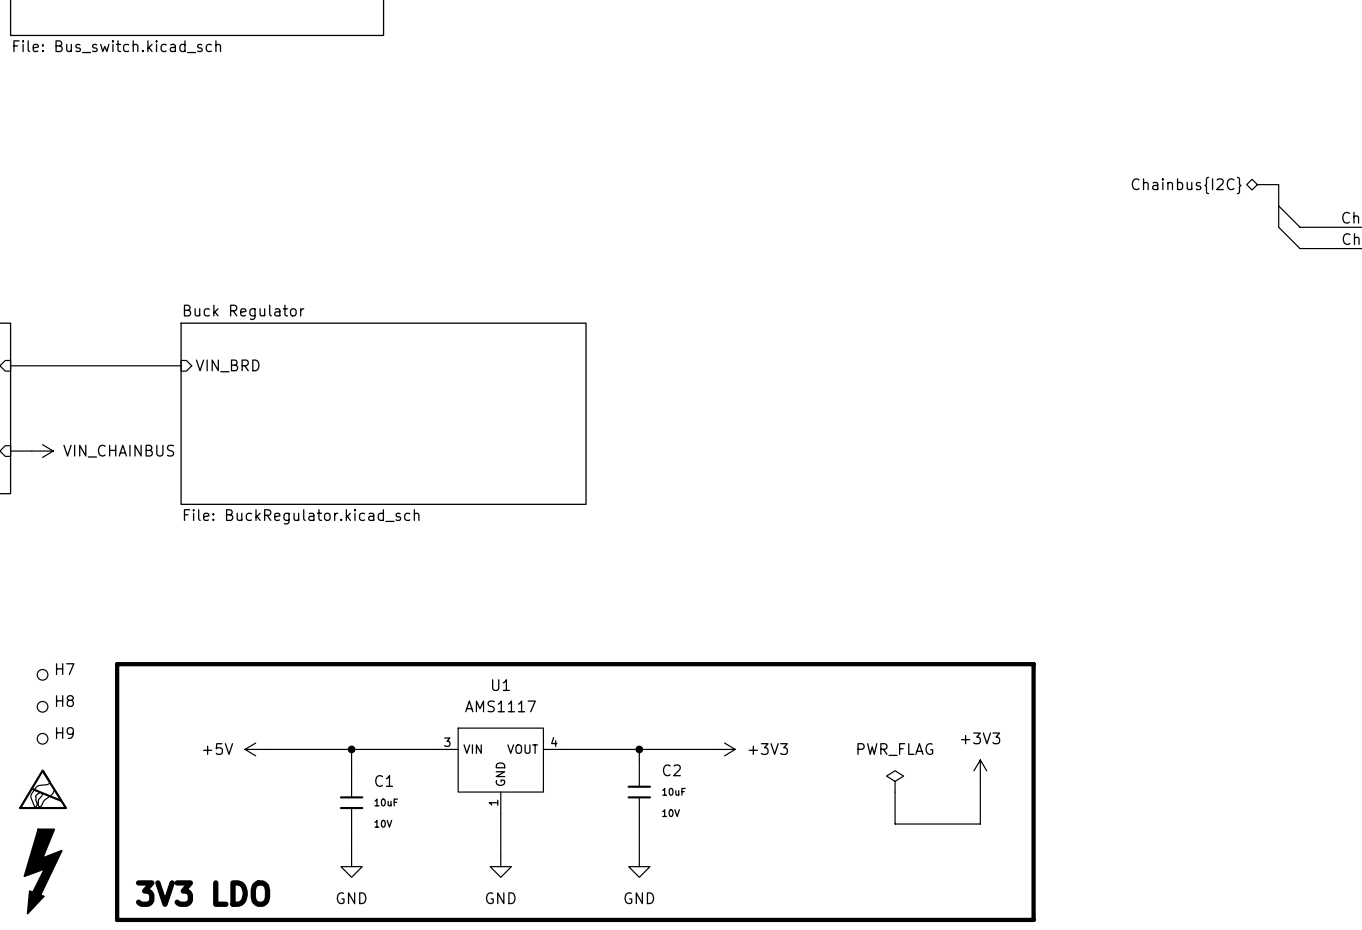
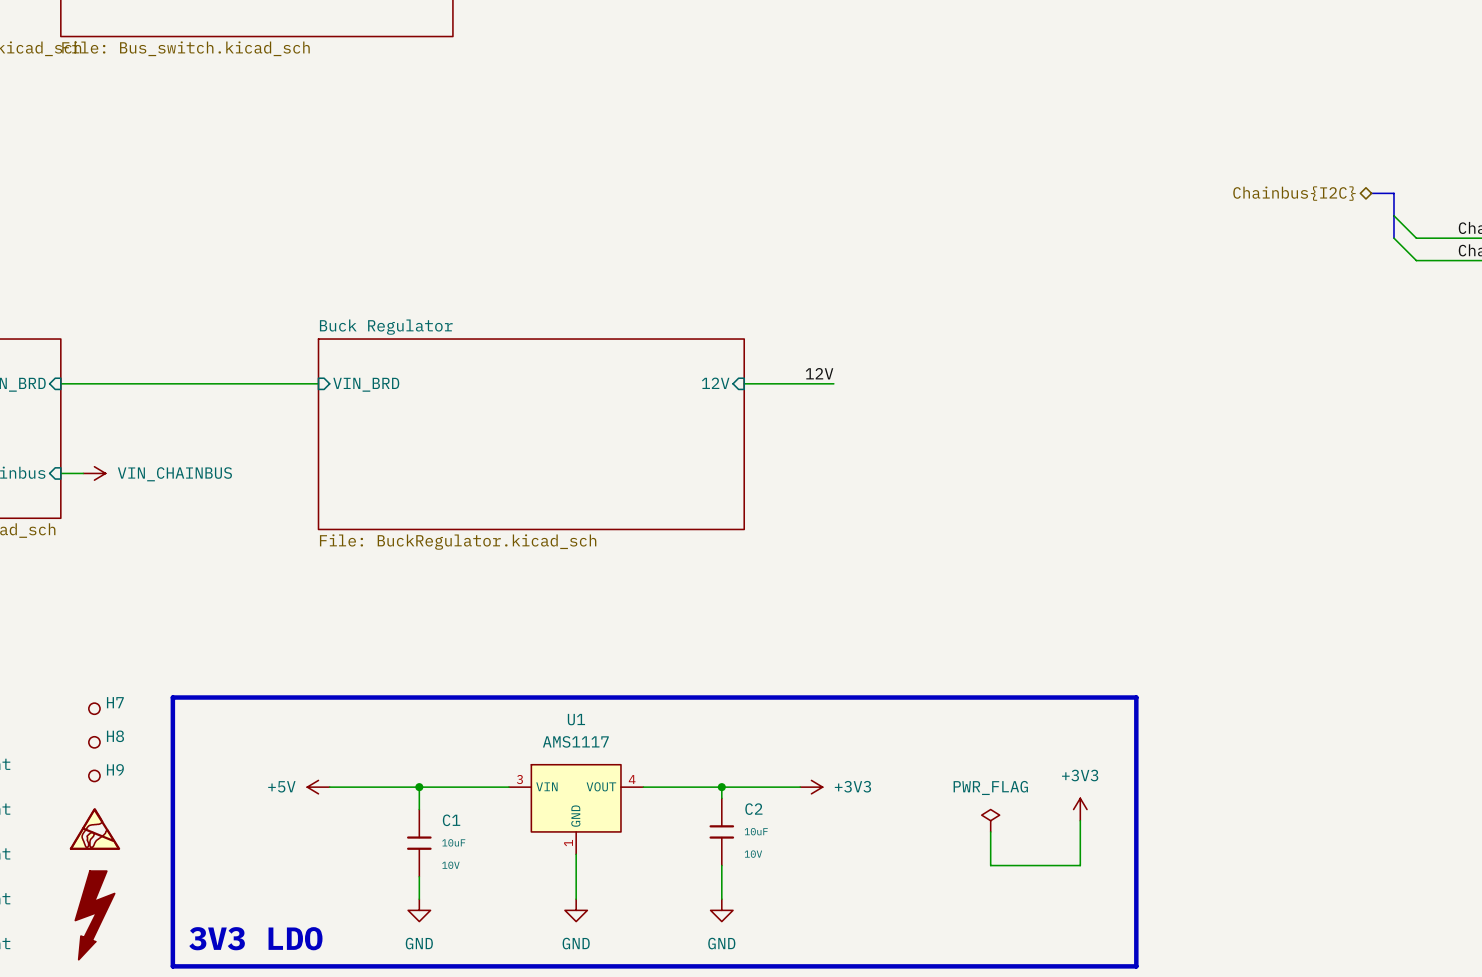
label: none -> 12V (819, 373)
wire: none -> (240, 383) (318, 383)
sheet pin position: VIN_BRD (227, 365) -> VIN_BRD (366, 384)
sheet pin: none -> 12V (715, 383)
wire: none -> (744, 383) (833, 383)
sheet Buck Regulator position: (383, 413) -> (531, 434)

